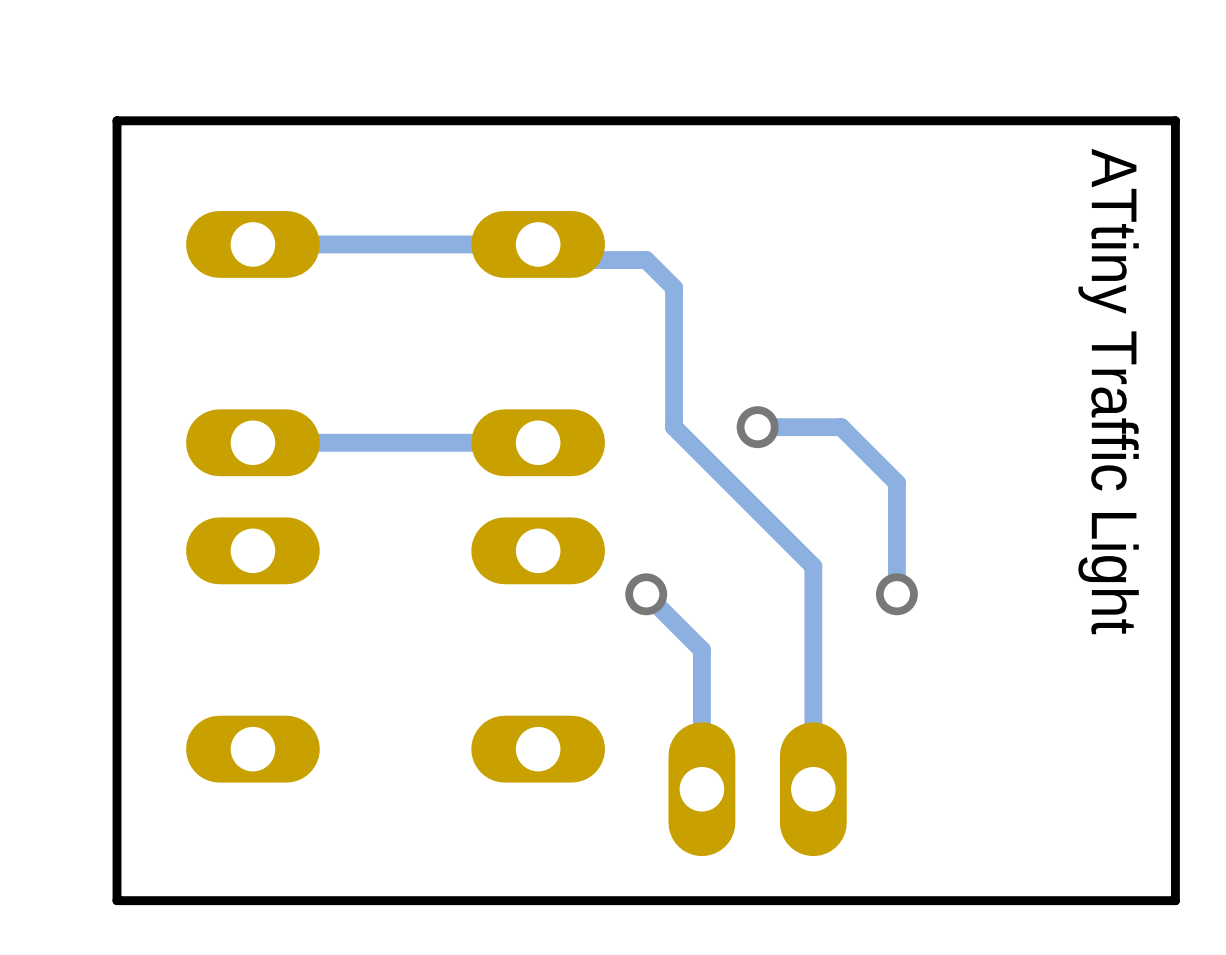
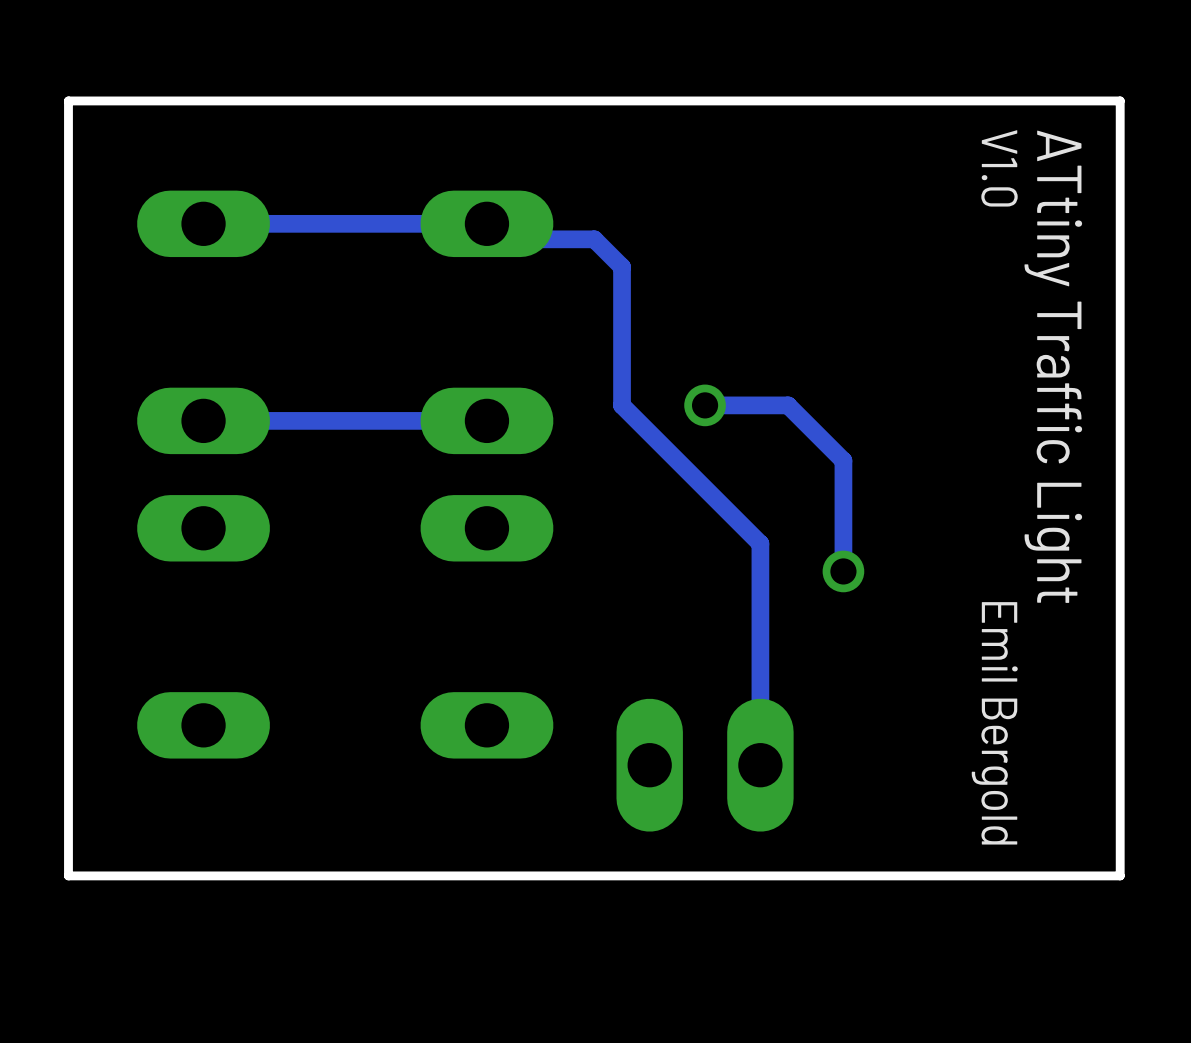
text: none -> V1.0 (999, 168)
track: (646, 594) (701, 649) (701, 789) -> none
via: (646, 594) -> none
text: none -> Emil Bergold (994, 723)

